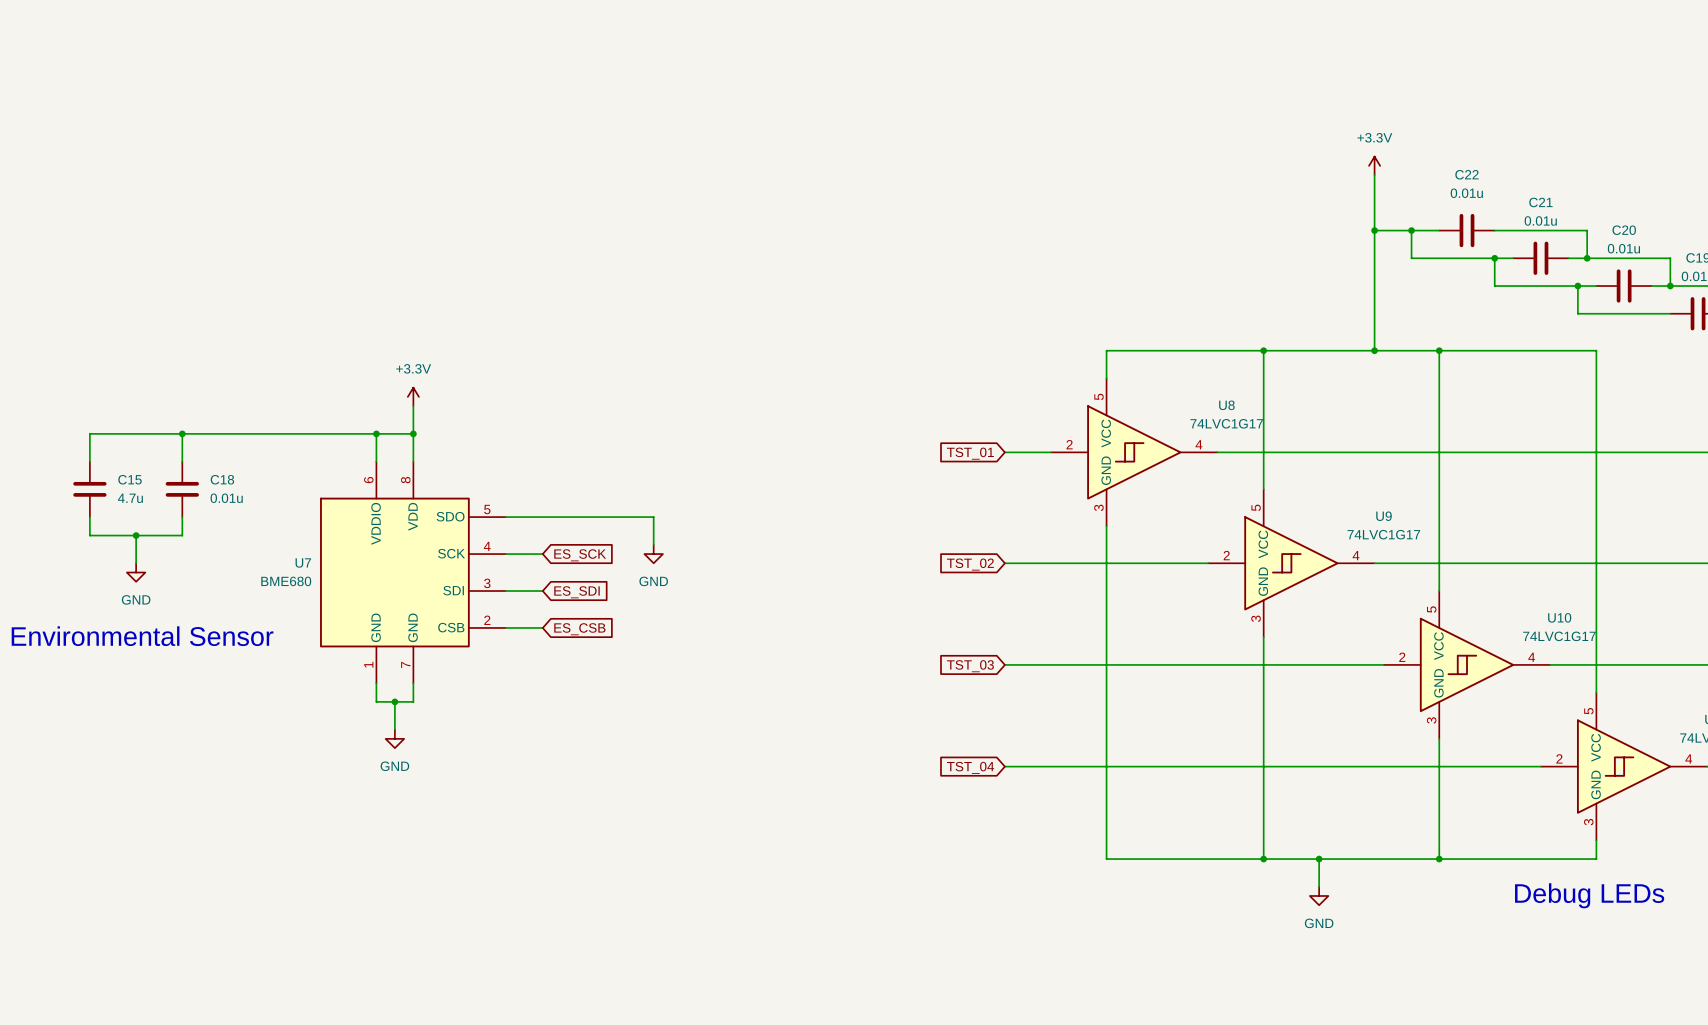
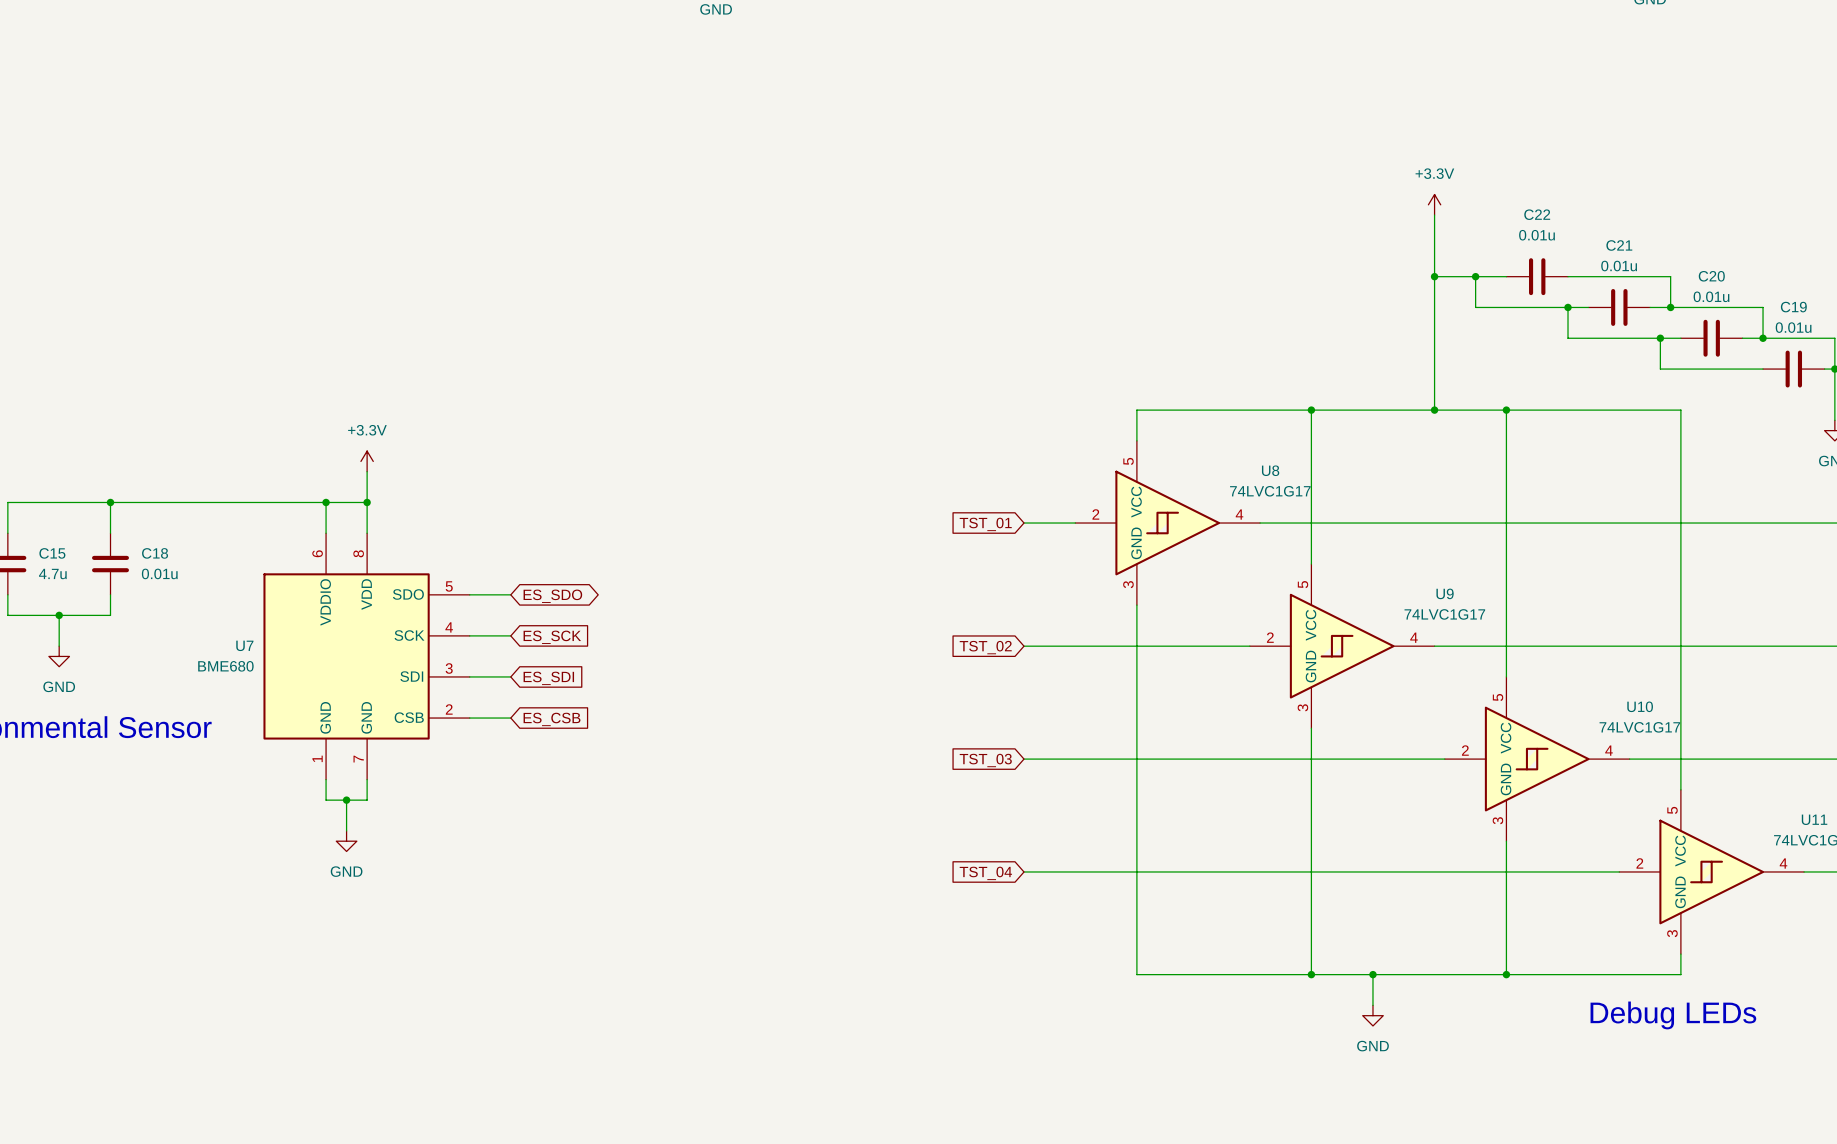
wire: (542, 517) (653, 517) (653, 544) -> none
global label: none -> ES_SDO (552, 596)
power symbol: GND (653, 554) -> none

